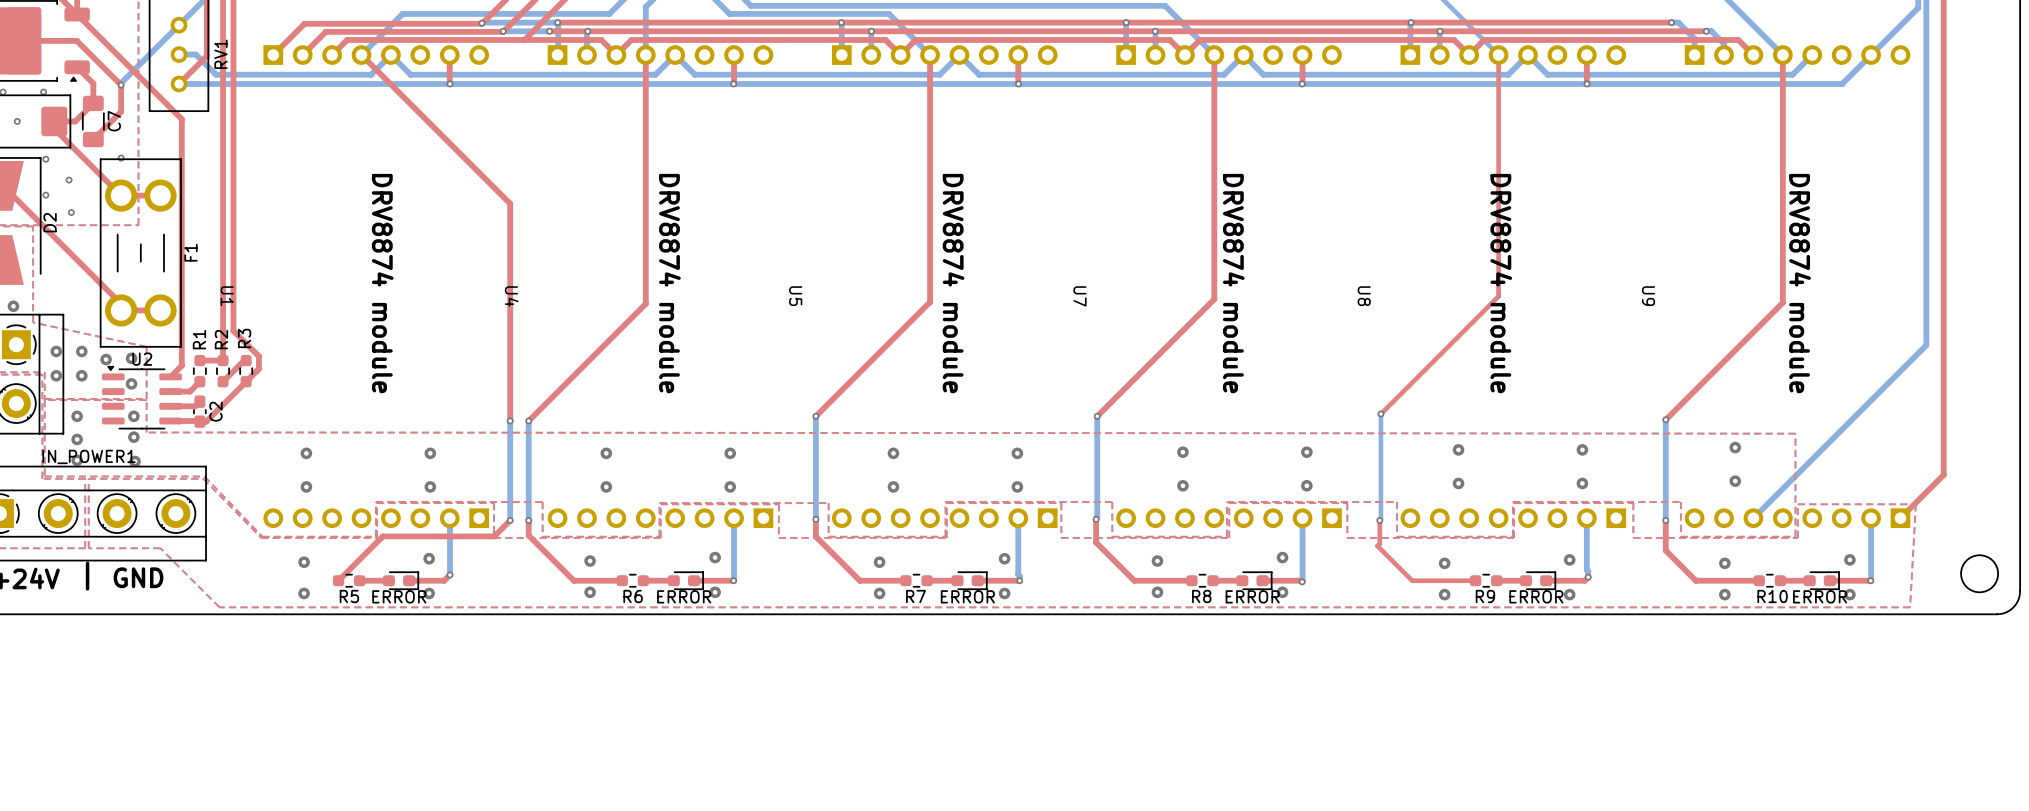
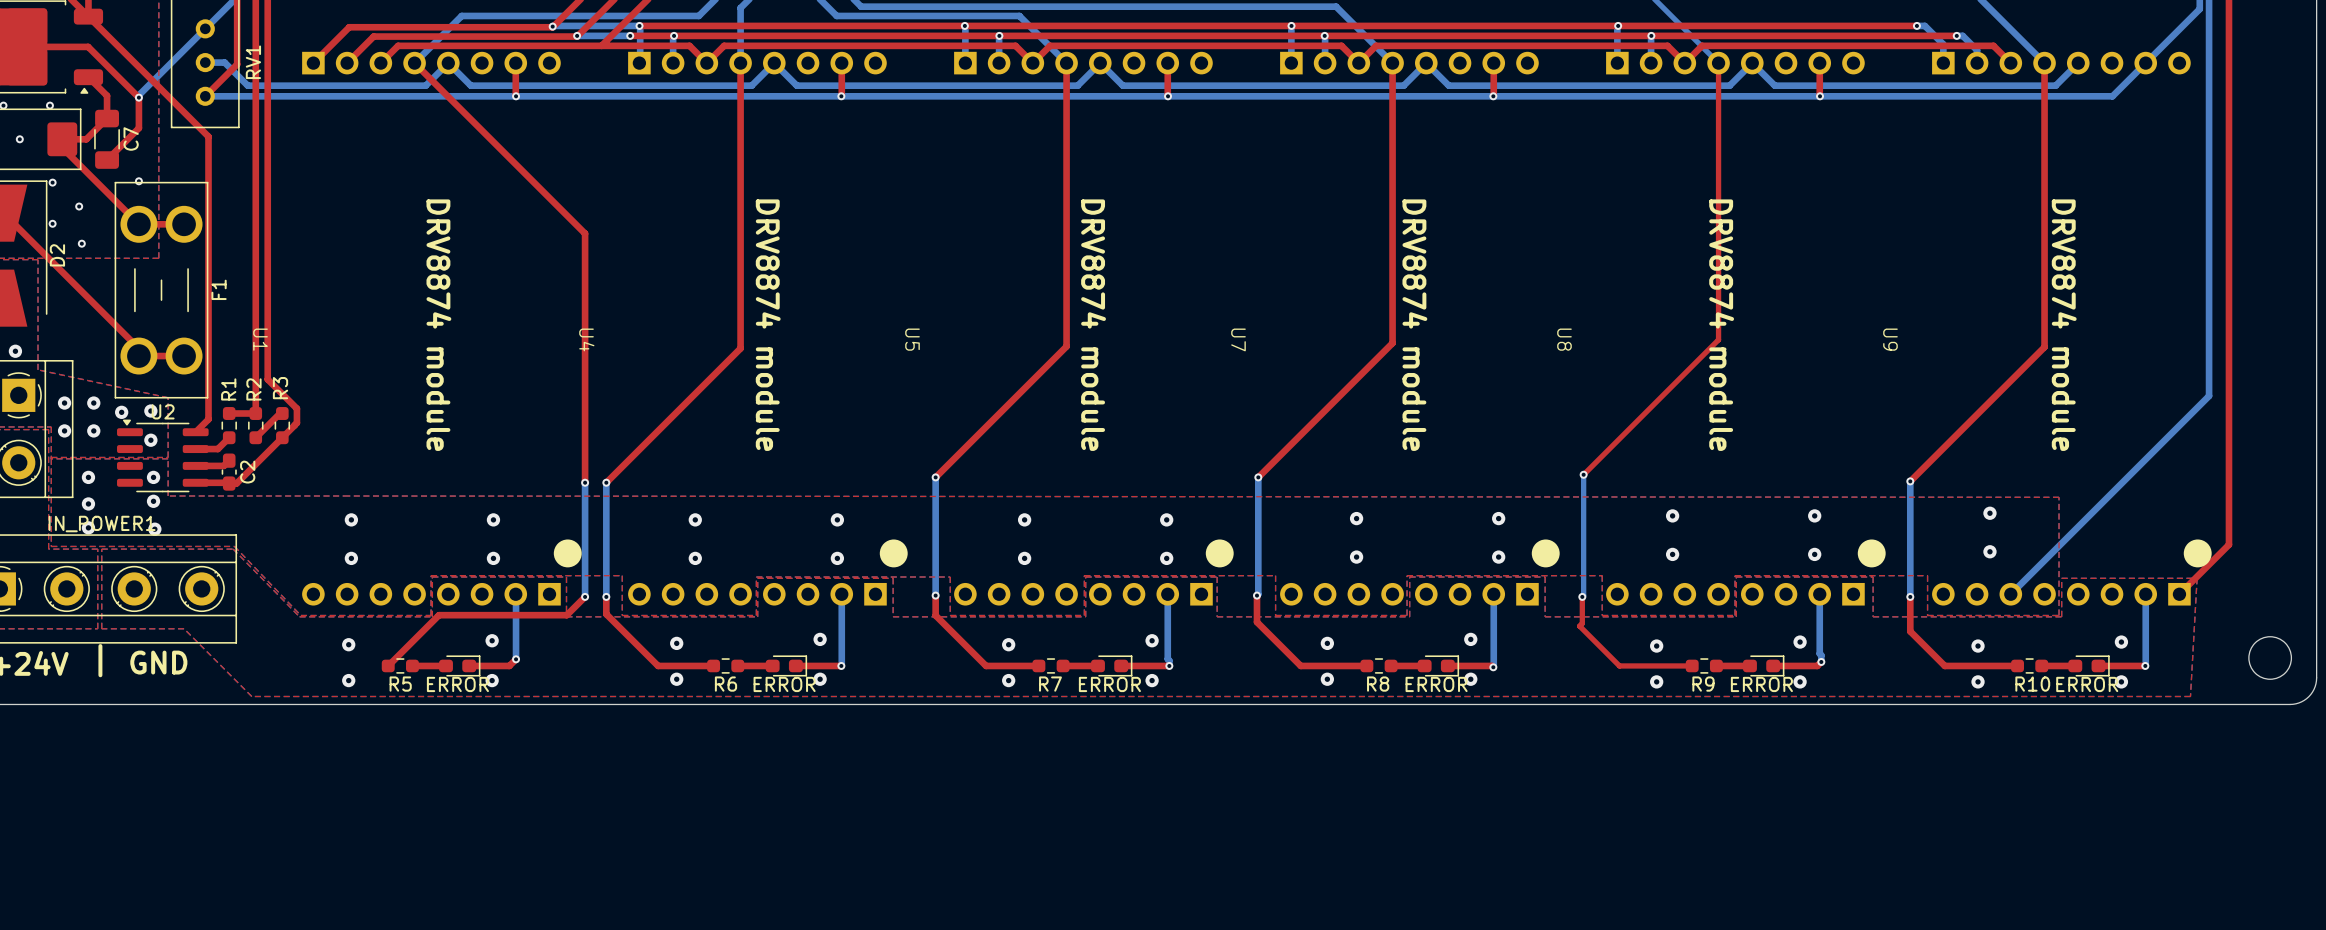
U1 footprint: [263, 45, 490, 529] -> [302, 51, 582, 606]
U4 footprint: [547, 45, 774, 529] -> [628, 51, 908, 606]
U5 footprint: [831, 45, 1058, 529] -> [954, 51, 1234, 606]
U7 footprint: [1116, 45, 1342, 529] -> [1280, 51, 1560, 606]
U8 footprint: [1400, 45, 1627, 529] -> [1606, 51, 1886, 606]
U9 footprint: [1684, 45, 1911, 529] -> [1932, 51, 2212, 606]

